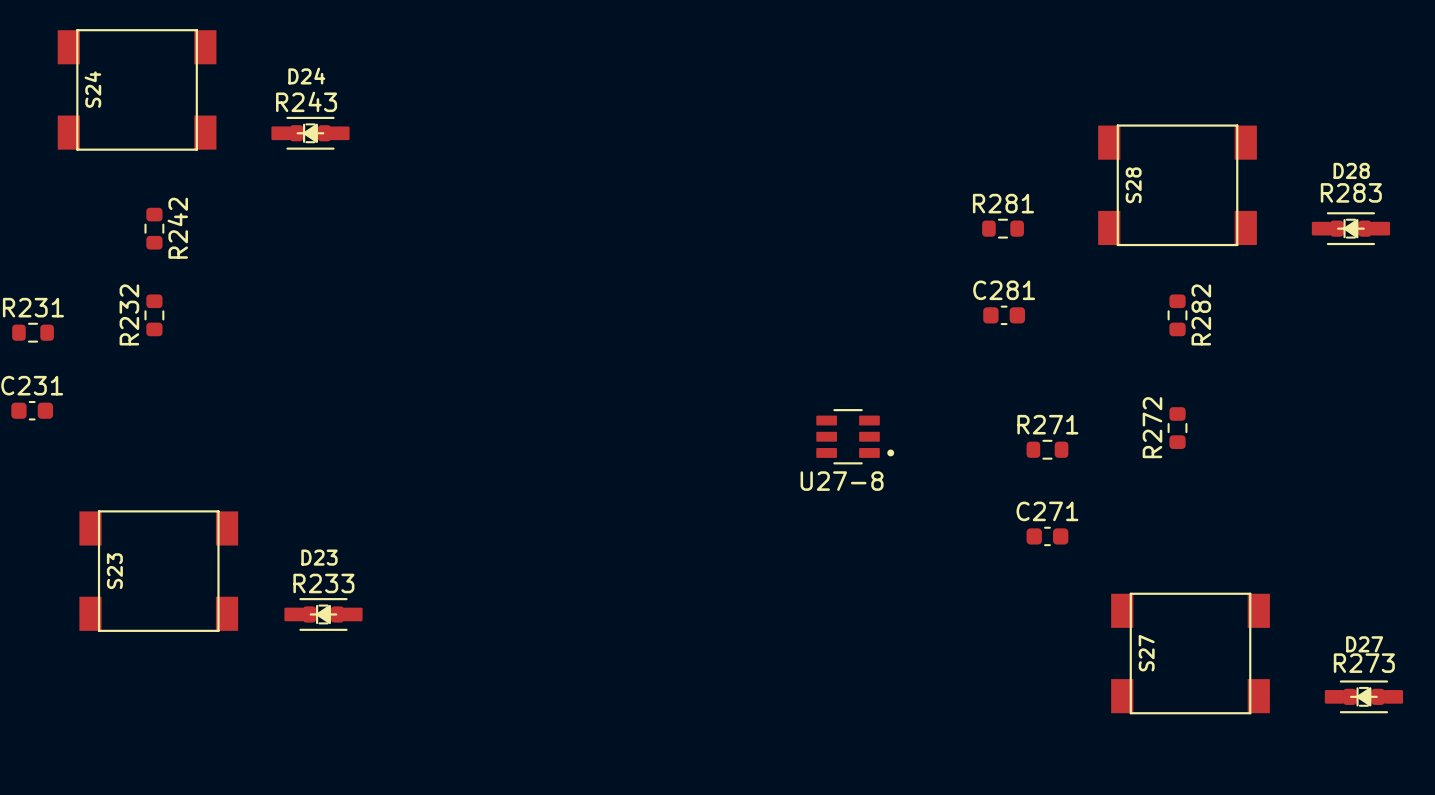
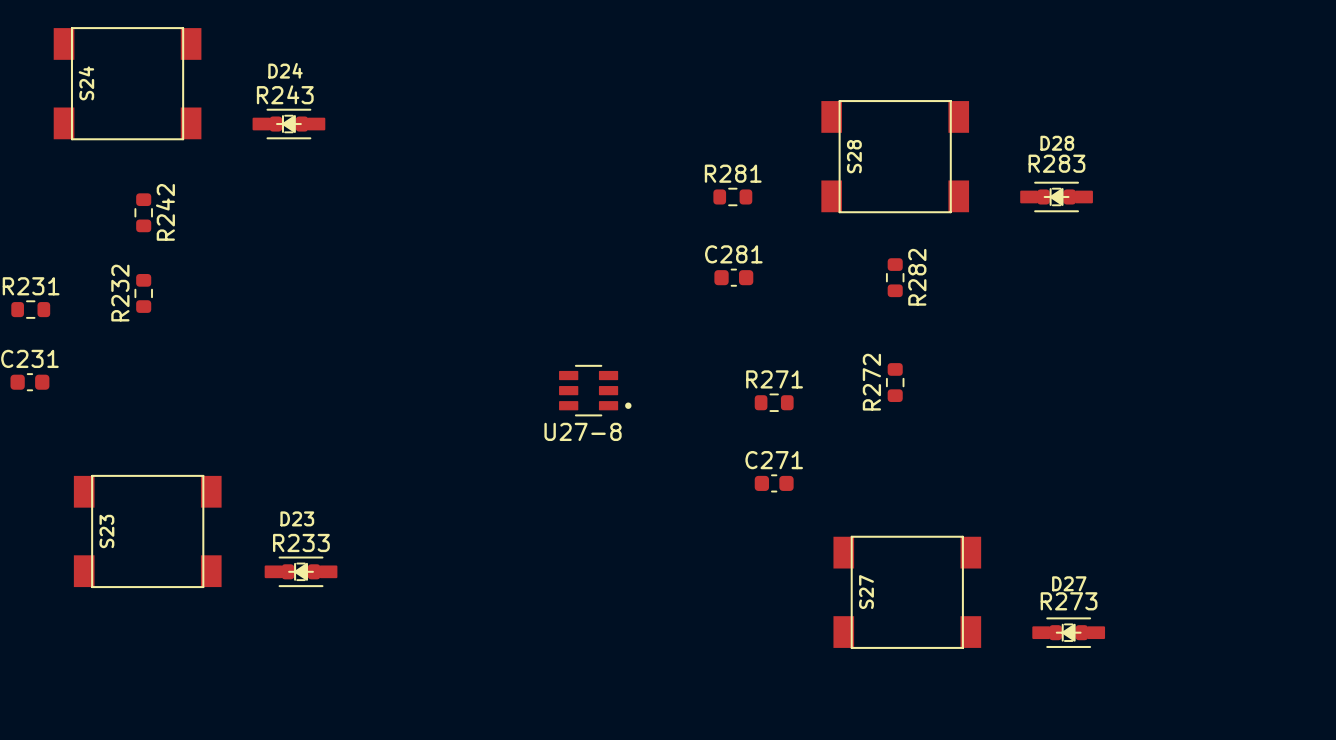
S28 position: (1177, 185) -> (895, 156)
R281 position: (1003, 228) -> (732, 196)
R283 position: (1350, 228) -> (1056, 196)
D28 position: (1350, 228) -> (1056, 196)
C281 position: (1004, 315) -> (733, 277)
R282 position: (1177, 315) -> (895, 277)
R272 position: (1177, 428) -> (895, 382)
U27-8 position: (855, 436) -> (595, 390)
R271 position: (1047, 449) -> (774, 402)
C271 position: (1047, 536) -> (774, 483)
S27 position: (1190, 653) -> (907, 592)
R273 position: (1363, 696) -> (1068, 632)
D27 position: (1363, 696) -> (1068, 632)

